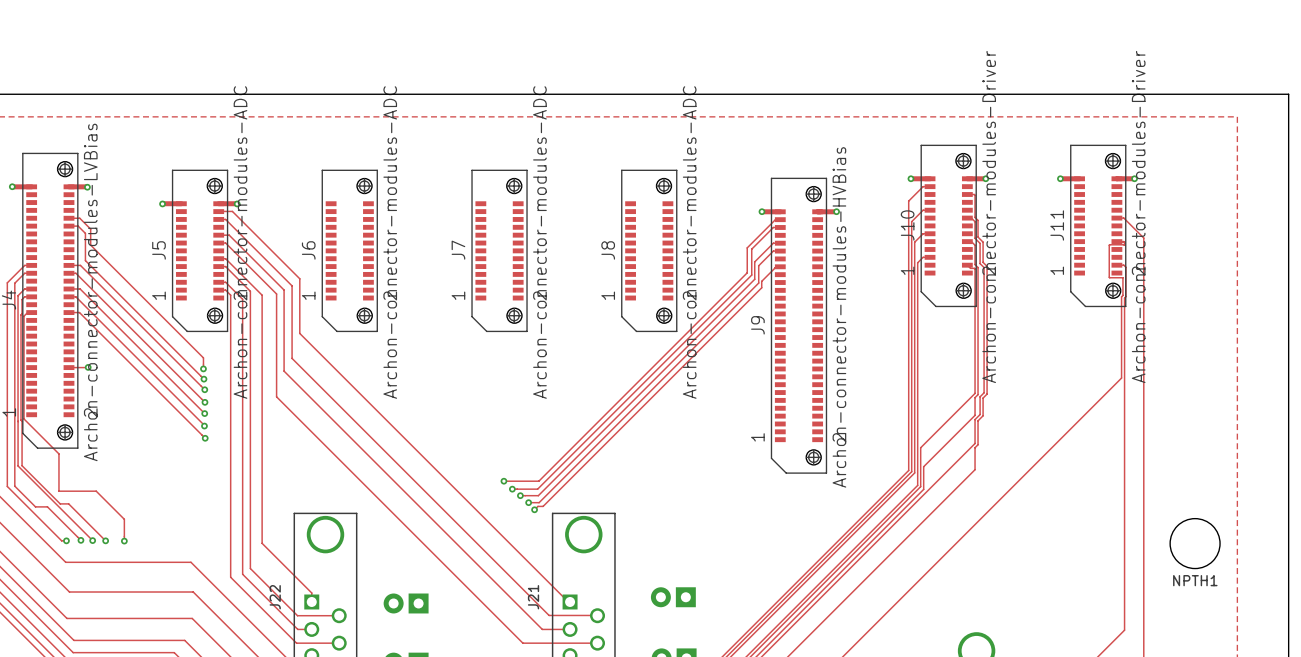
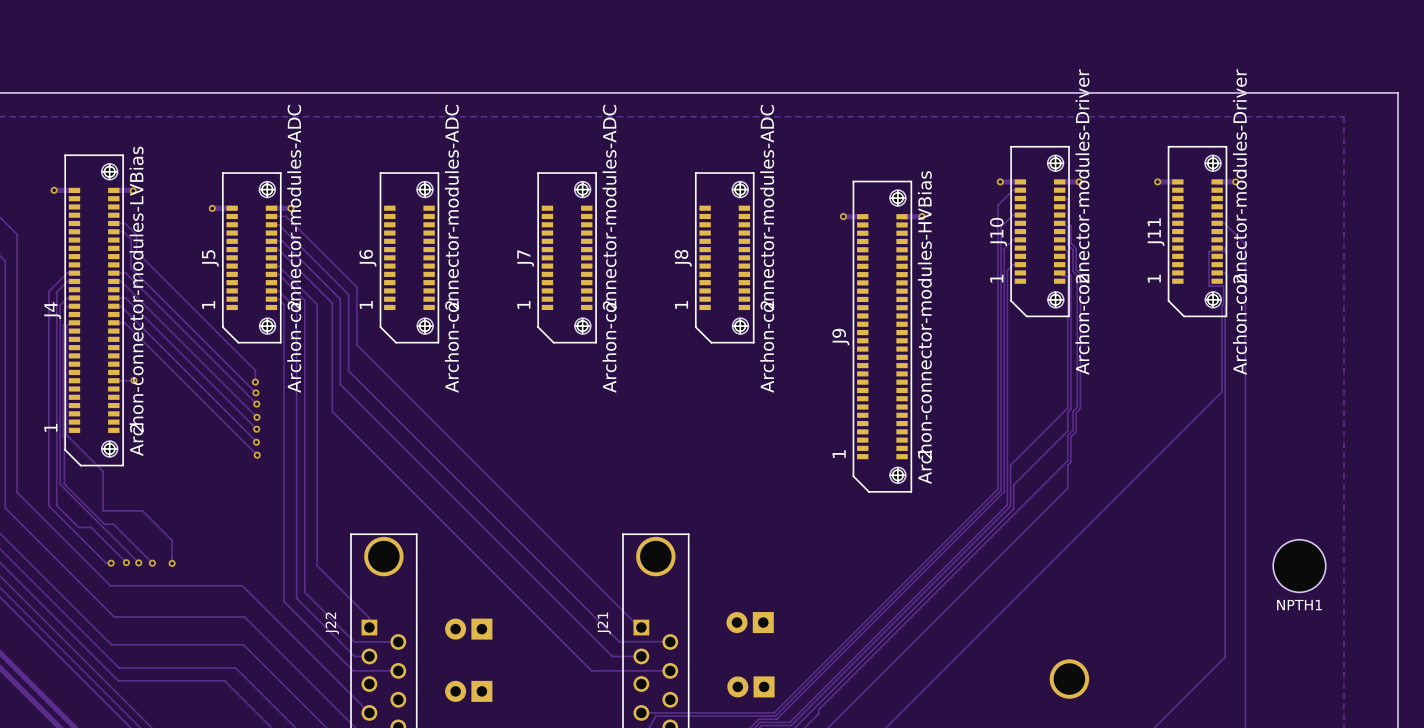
track: (780, 219) (775, 219) (747, 247) (747, 272) (538, 481) (503, 481) -> none
track: (780, 227) (773, 227) (751, 249) (751, 275) (537, 489) (512, 489) -> none
track: (780, 243) (773, 243) (754, 261) (754, 279) (538, 495) (520, 495) -> none
track: (780, 251) (773, 251) (758, 265) (758, 283) (539, 502) (528, 502) -> none
track: (780, 266) (776, 266) (761, 281) (761, 287) (543, 506) (537, 506) (534, 509) -> none
via: (503, 481) -> none
via: (512, 489) -> none
via: (520, 495) -> none
via: (528, 502) -> none
via: (534, 509) -> none

